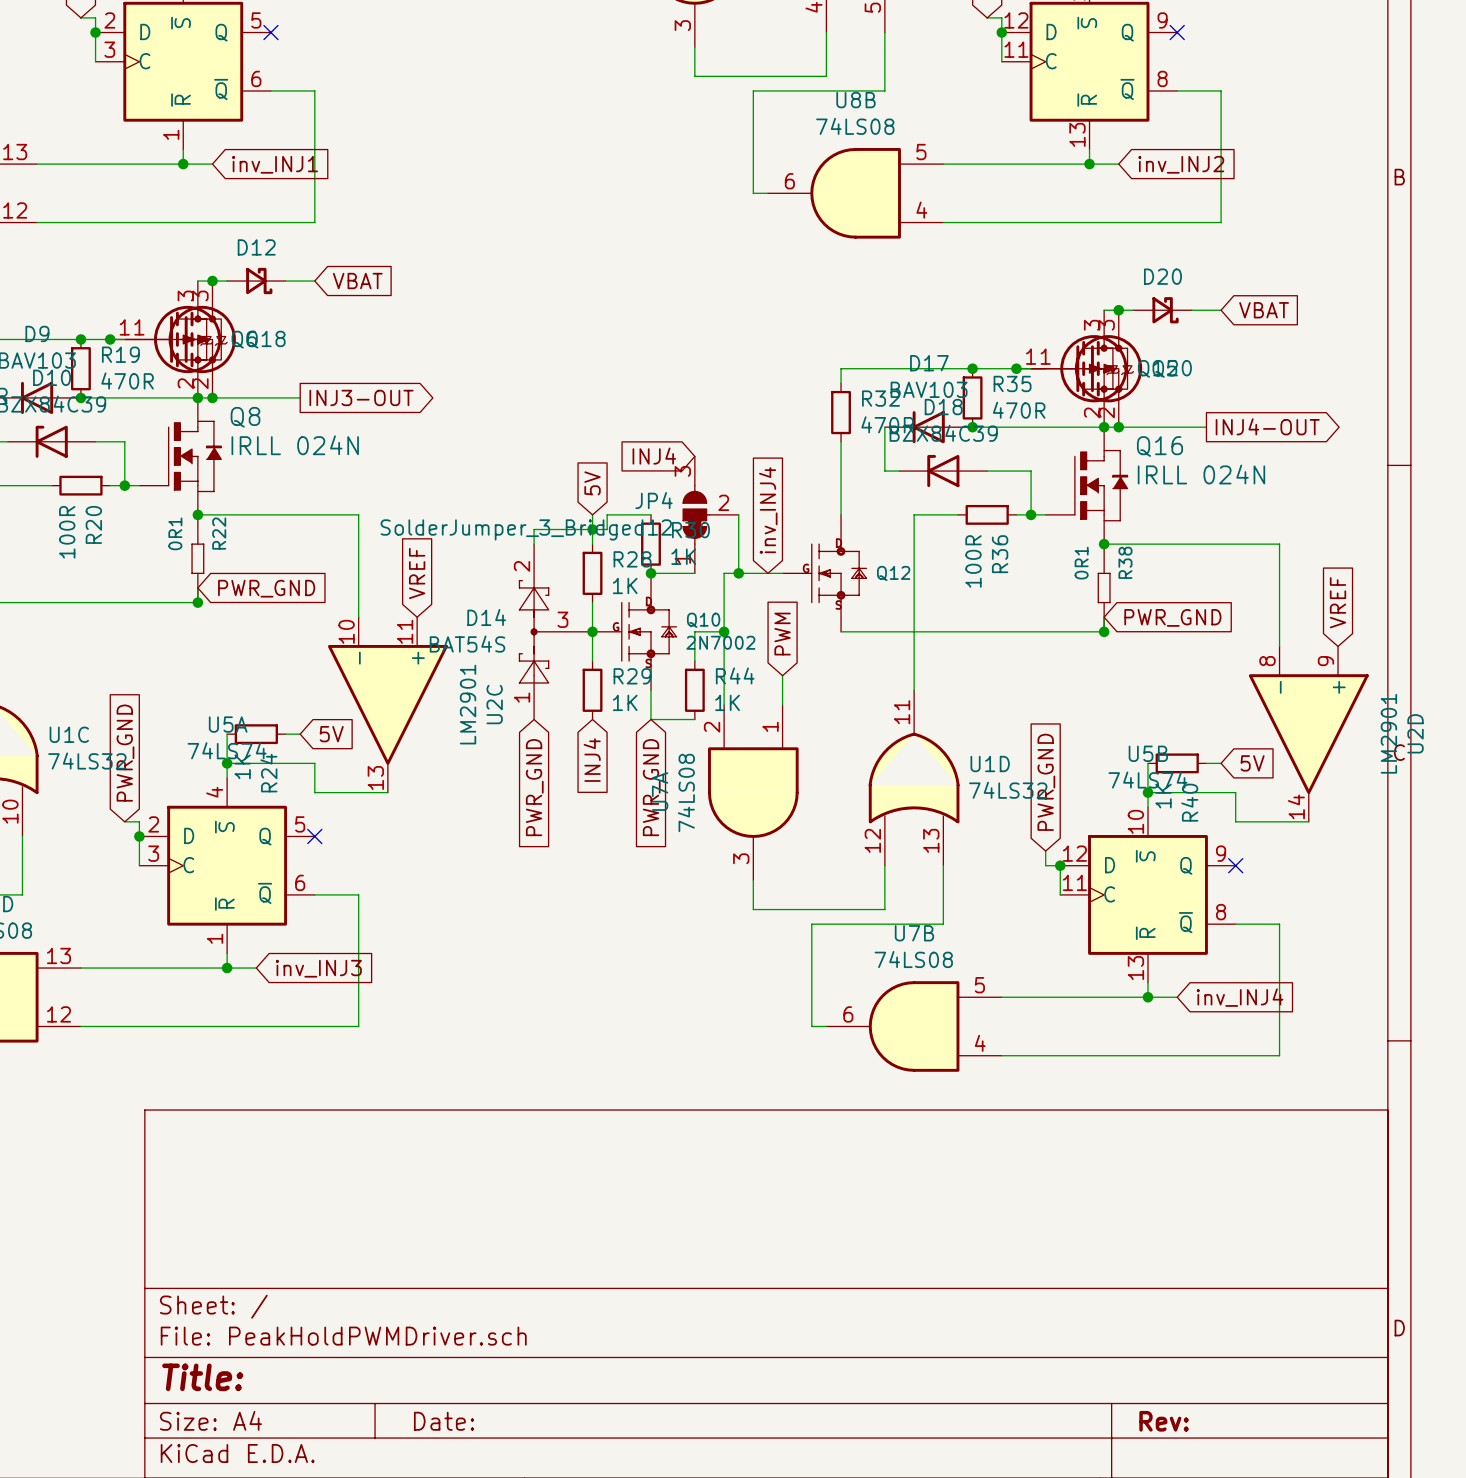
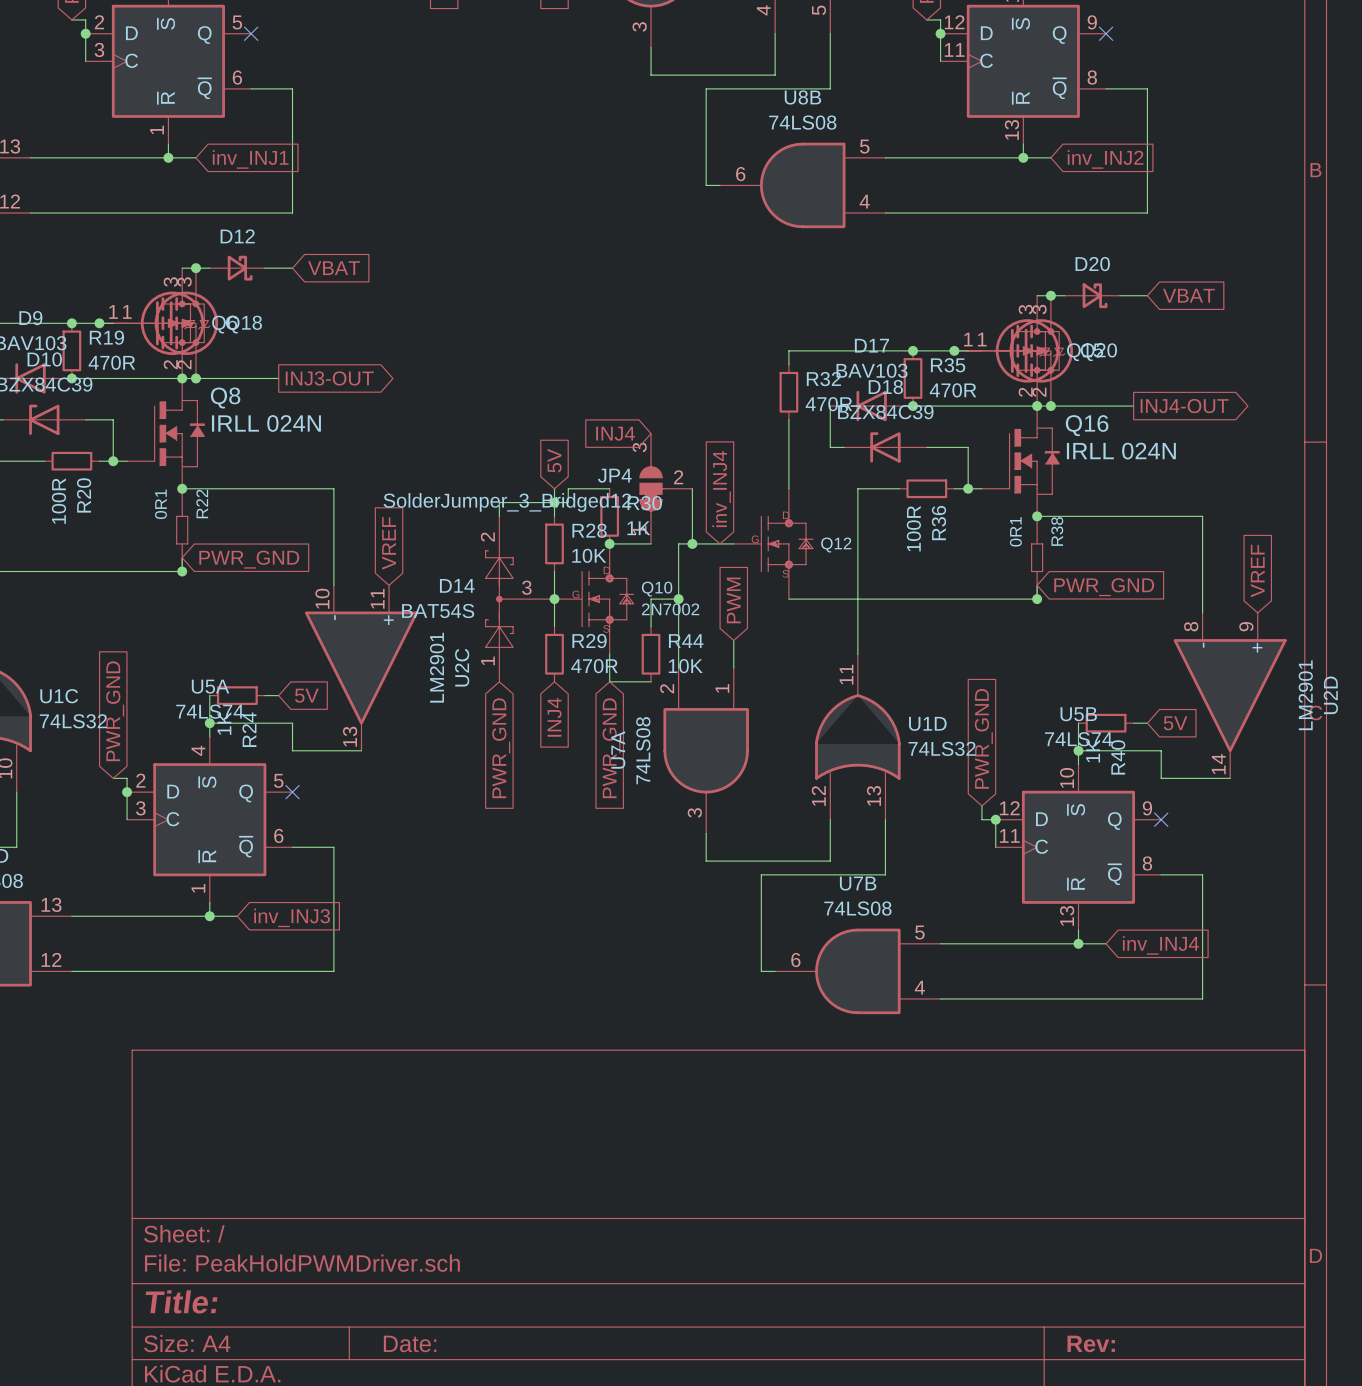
R28 value: 1K (625, 585) -> 10K (589, 555)
R29 value: 1K (625, 702) -> 470R (594, 666)
R44 value: 1K (727, 702) -> 10K (685, 666)

